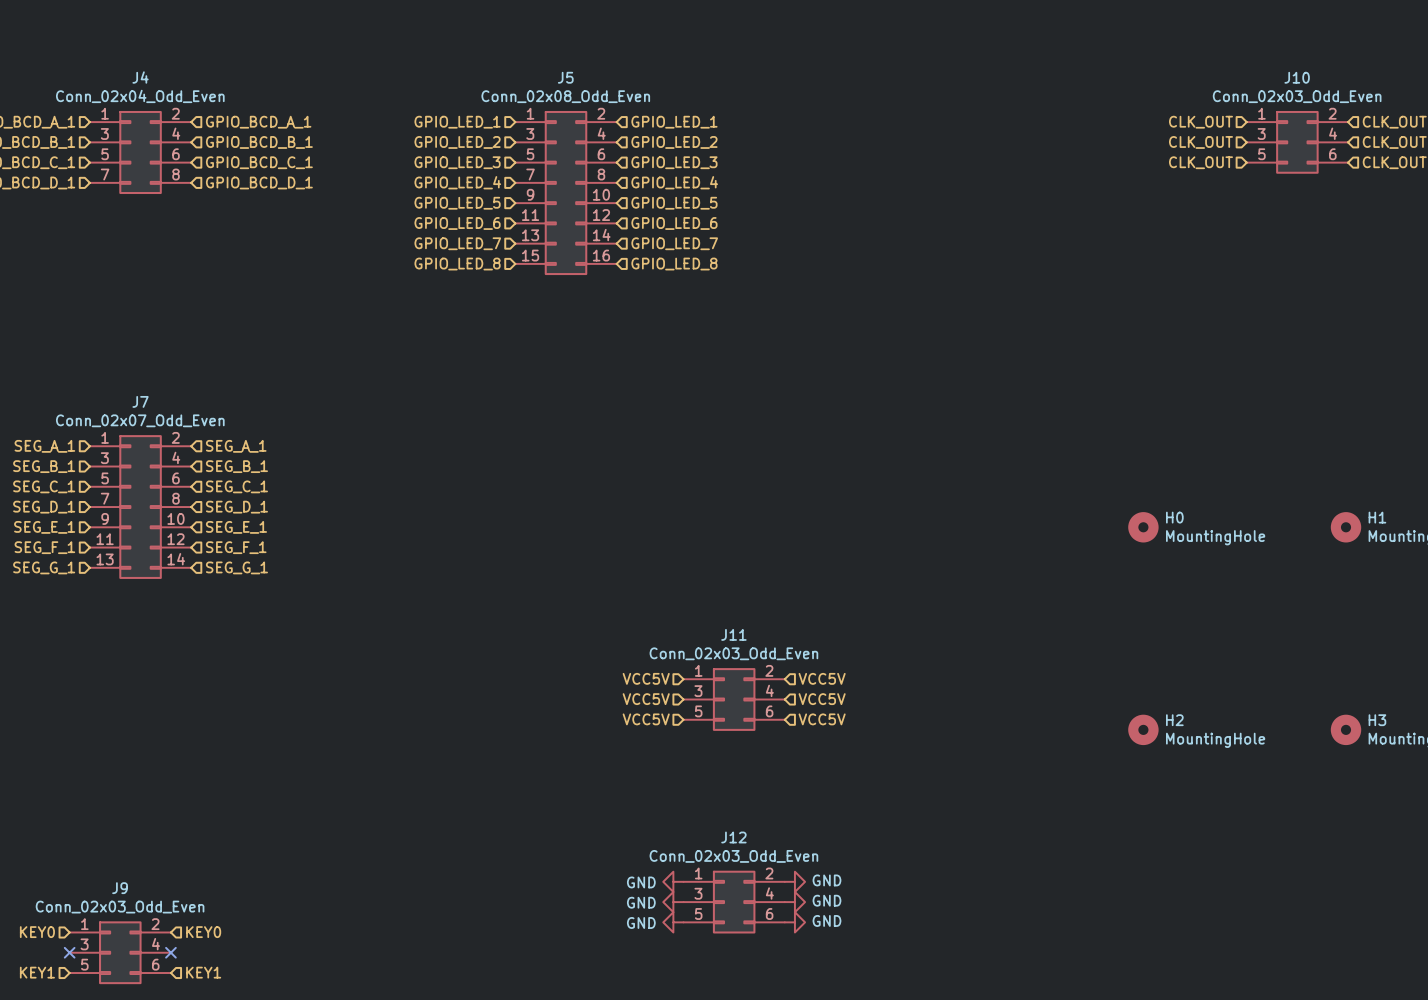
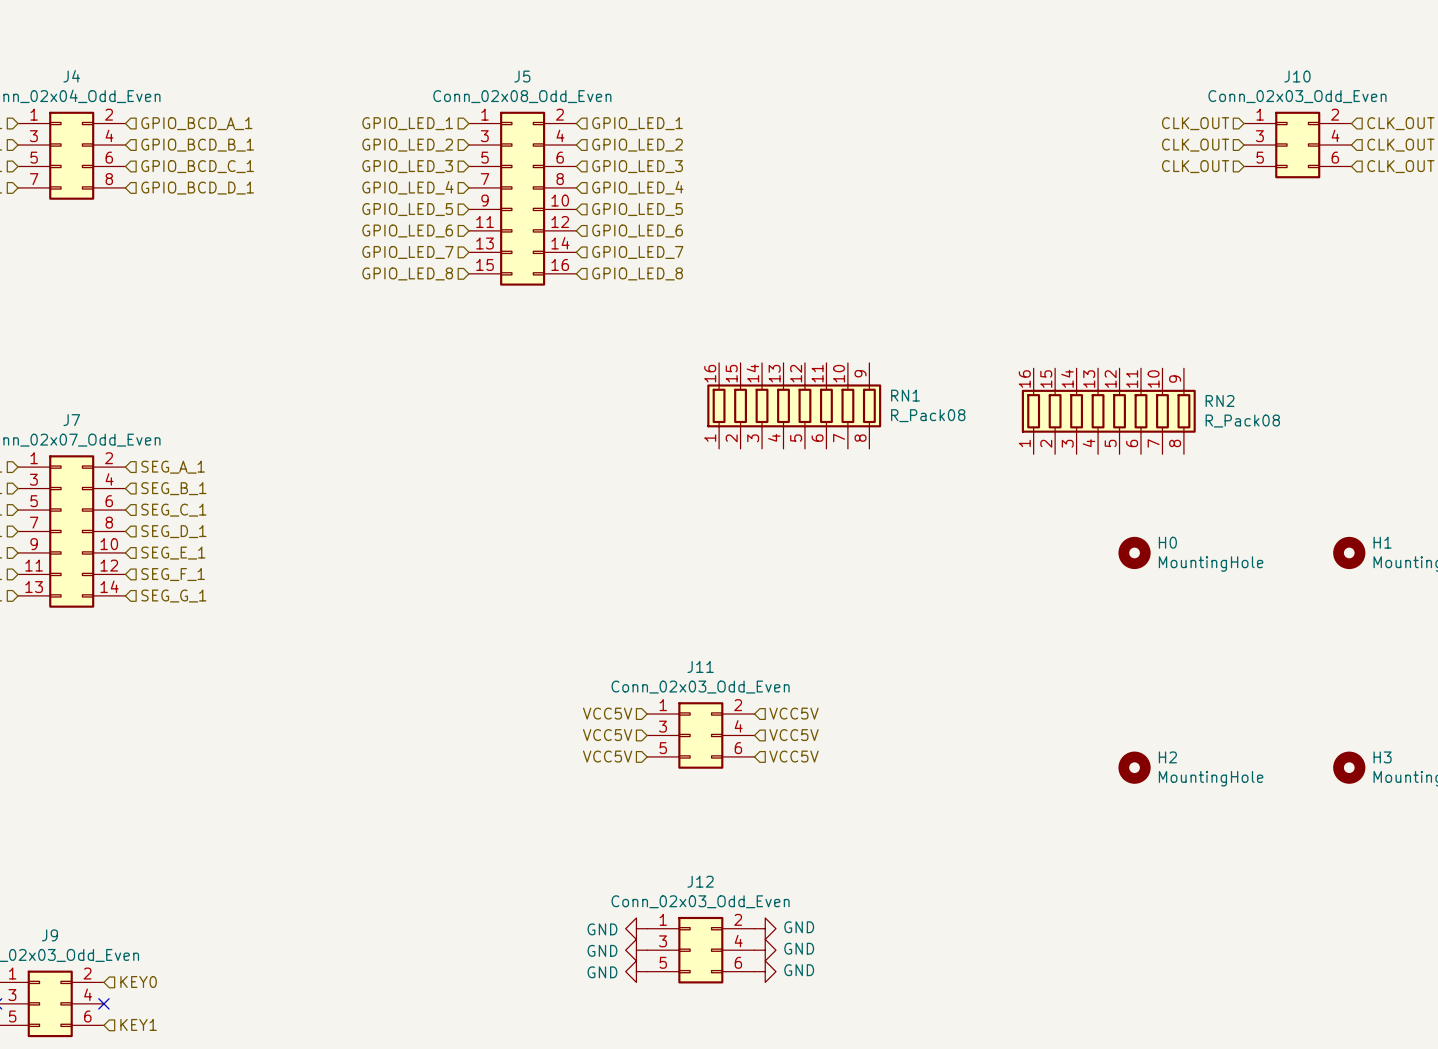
RN1: none -> R_Pack08 (794, 405)
RN2: none -> R_Pack08 (1108, 411)

